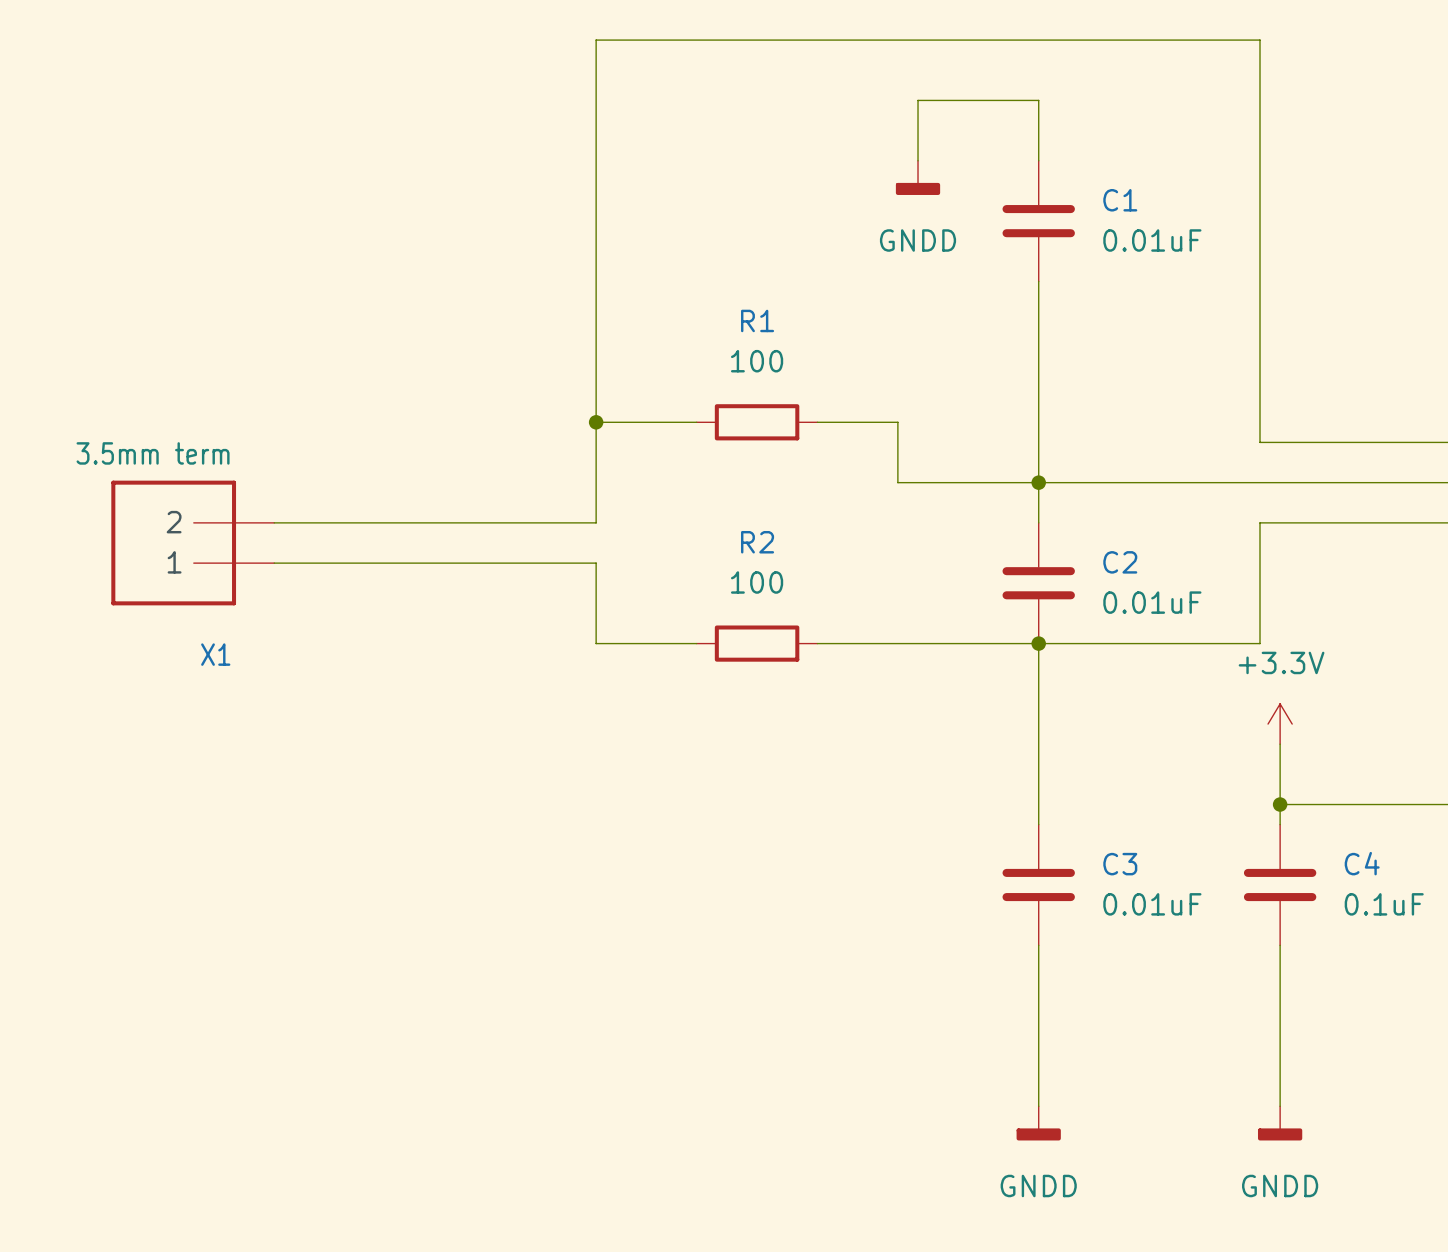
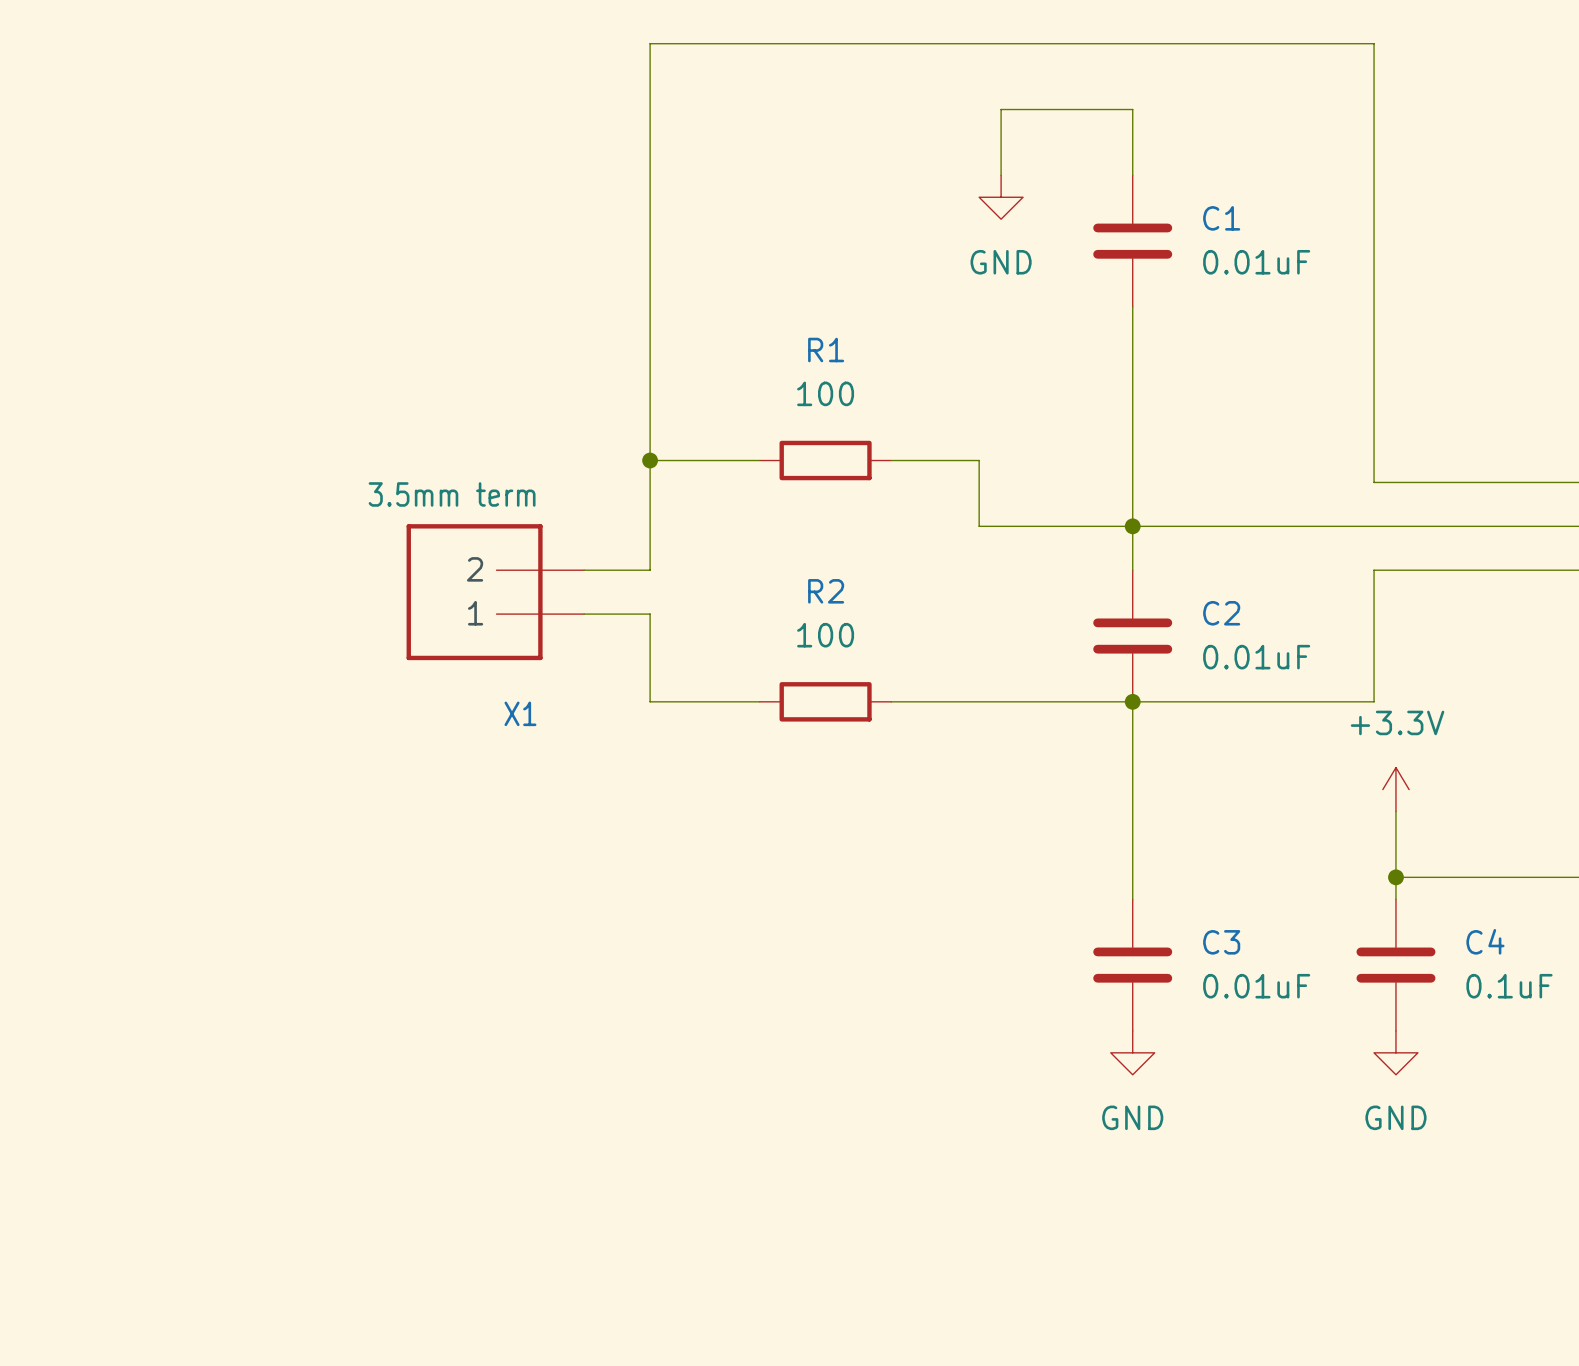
power symbol: GNDD (918, 177) -> GND (1001, 197)
wire: (274, 522) (535, 522) -> none
X1 position: (192, 543) -> (495, 592)
wire: (274, 563) (535, 563) -> none
wire: (1038, 945) (1038, 1106) -> none
wire: (1280, 945) (1280, 1106) -> none
power symbol: none -> GND (1132, 1052)
power symbol: none -> GND (1395, 1052)
power symbol: GNDD (1038, 1123) -> none
power symbol: GNDD (1280, 1123) -> none

